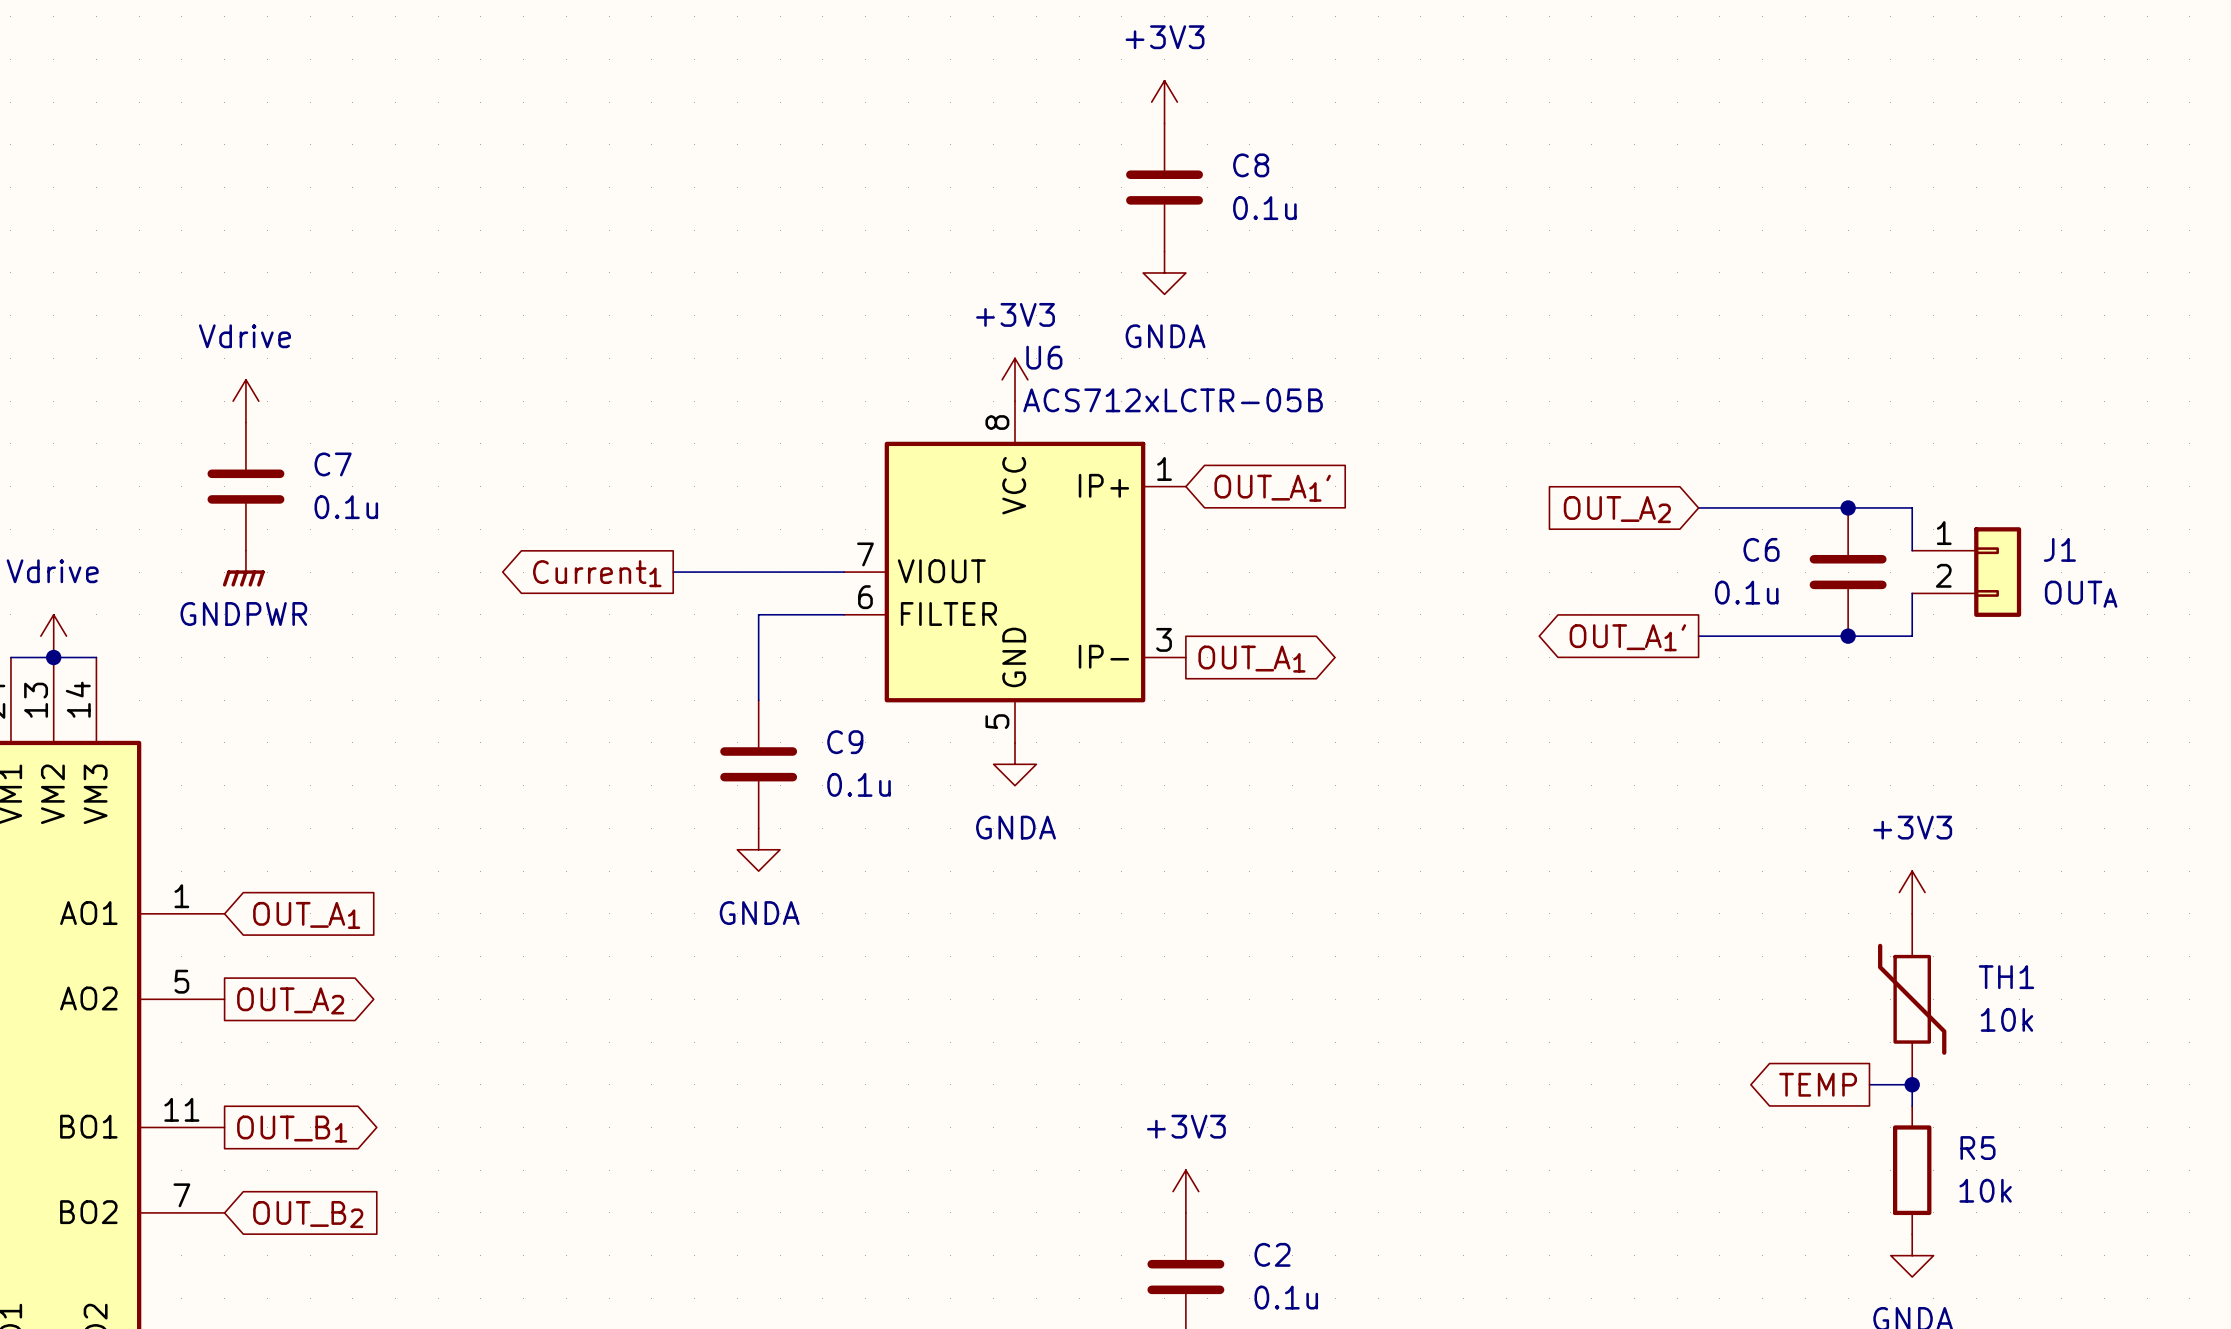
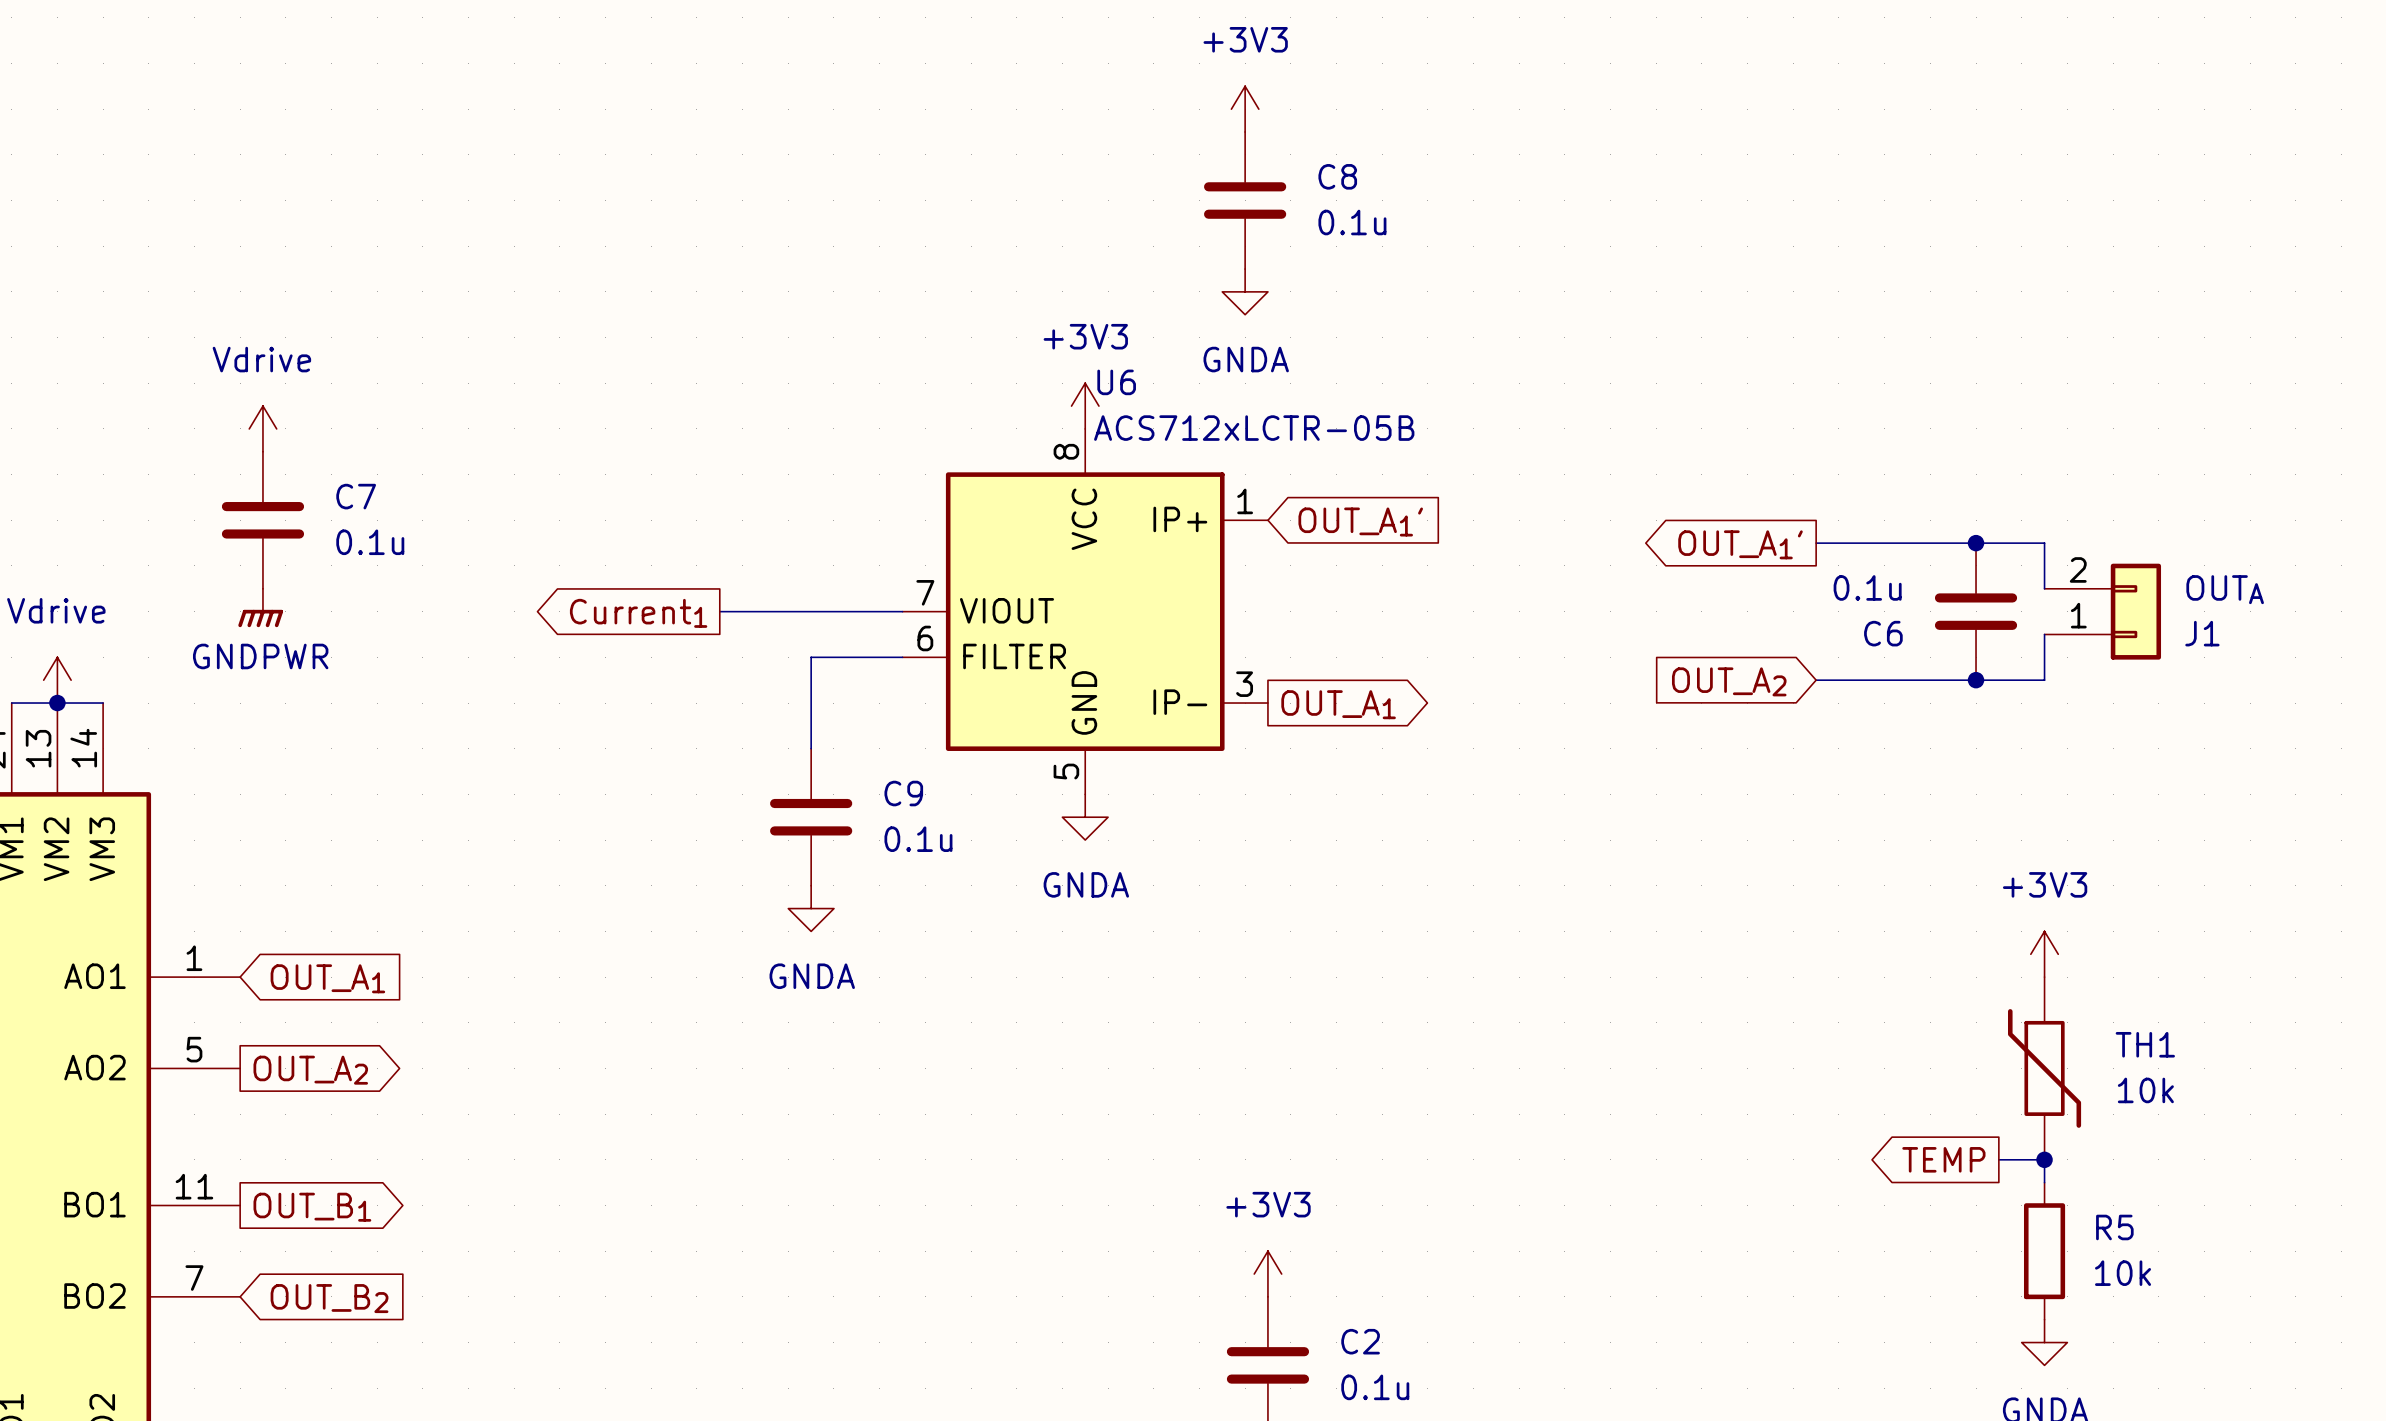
global label shape: input (1617, 509) -> output (1740, 544)
global label: OUT_A2 (1617, 509) -> OUT_A1' (1740, 544)
C6 name position: C6 (1761, 549) -> C6 (1883, 633)
J1 flip: as is (1997, 572) -> up-down (2135, 611)
C6 value position: 0.1u (1746, 592) -> 0.1u (1867, 587)
global label shape: output (1627, 637) -> input (1729, 681)
global label: OUT_A1' (1627, 637) -> OUT_A2 (1729, 681)

